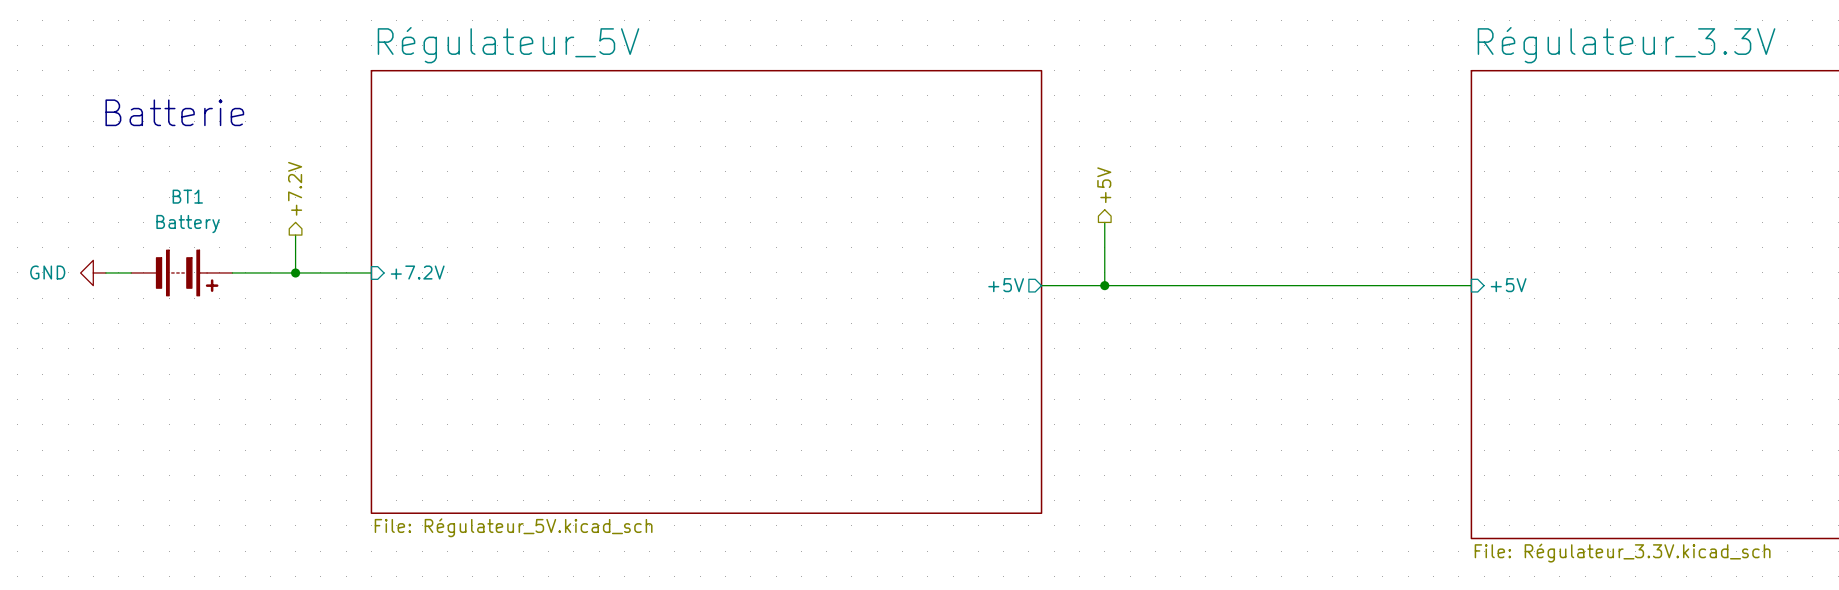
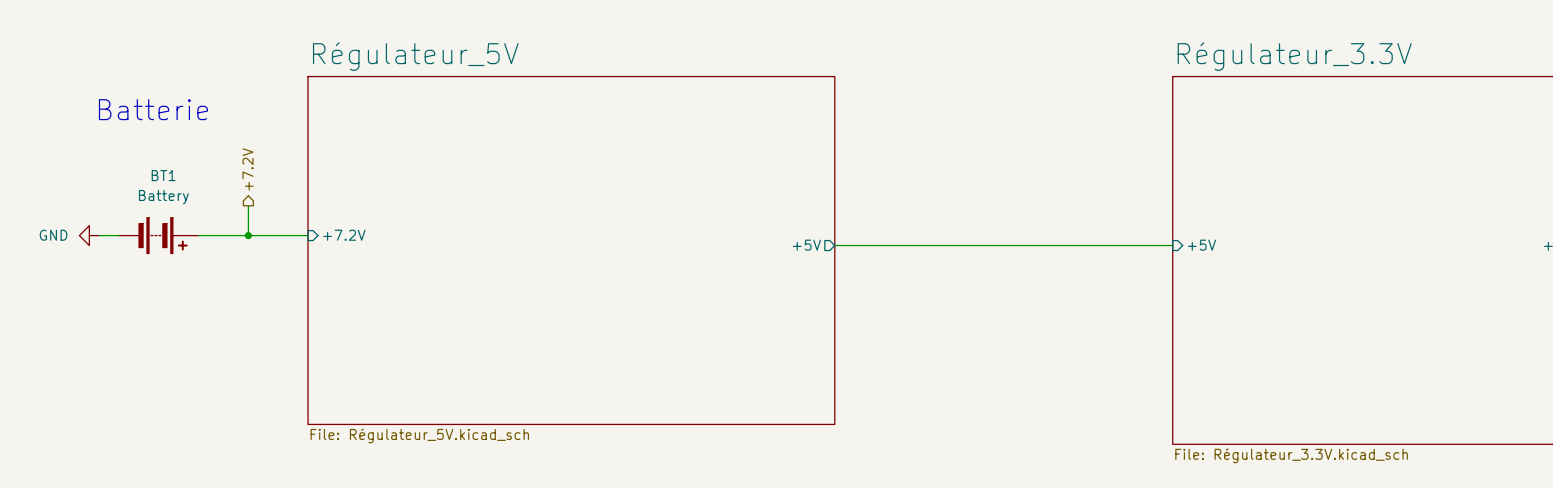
hierarchical label: +5V (1104, 185) -> none
wire: (1104, 222) (1104, 285) -> none
junction: (1104, 285) -> none

